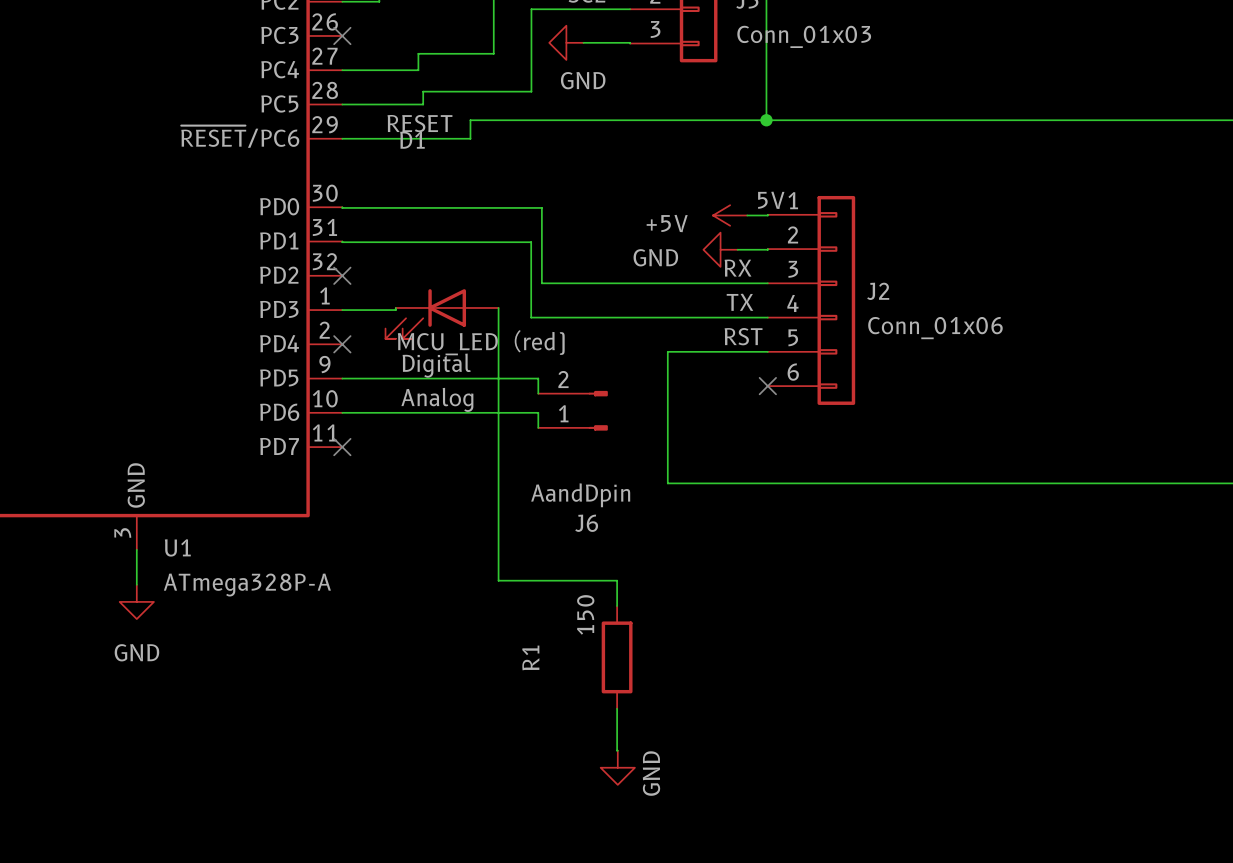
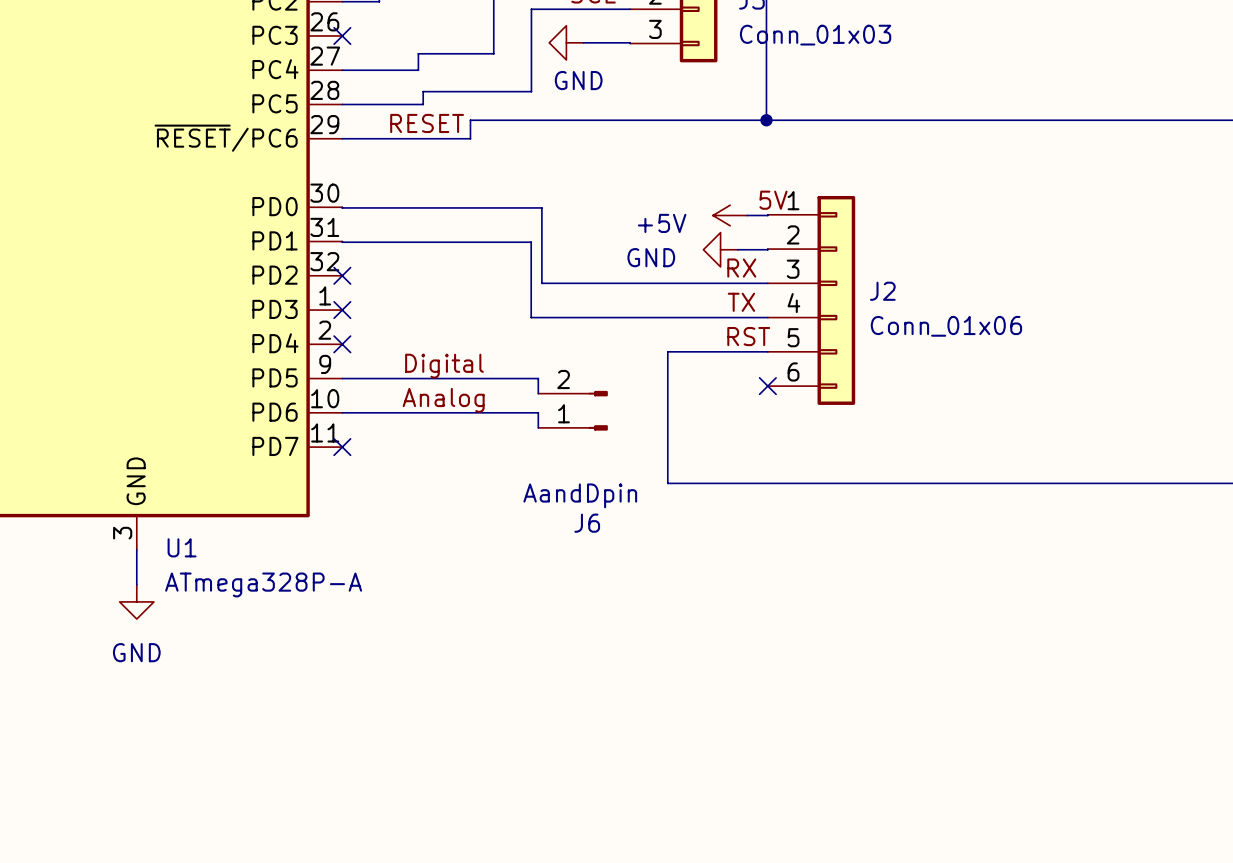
wire: (395, 307) (395, 310) (342, 310) -> none
wire: (498, 307) (498, 580) (617, 580) (617, 606) -> none
no-connect mark: none -> (342, 310)
D1: MCU_LED（red) (442, 313) -> none
R1: 150 (617, 657) -> none
wire: (617, 708) (617, 750) -> none
power symbol: GND (617, 767) -> none

